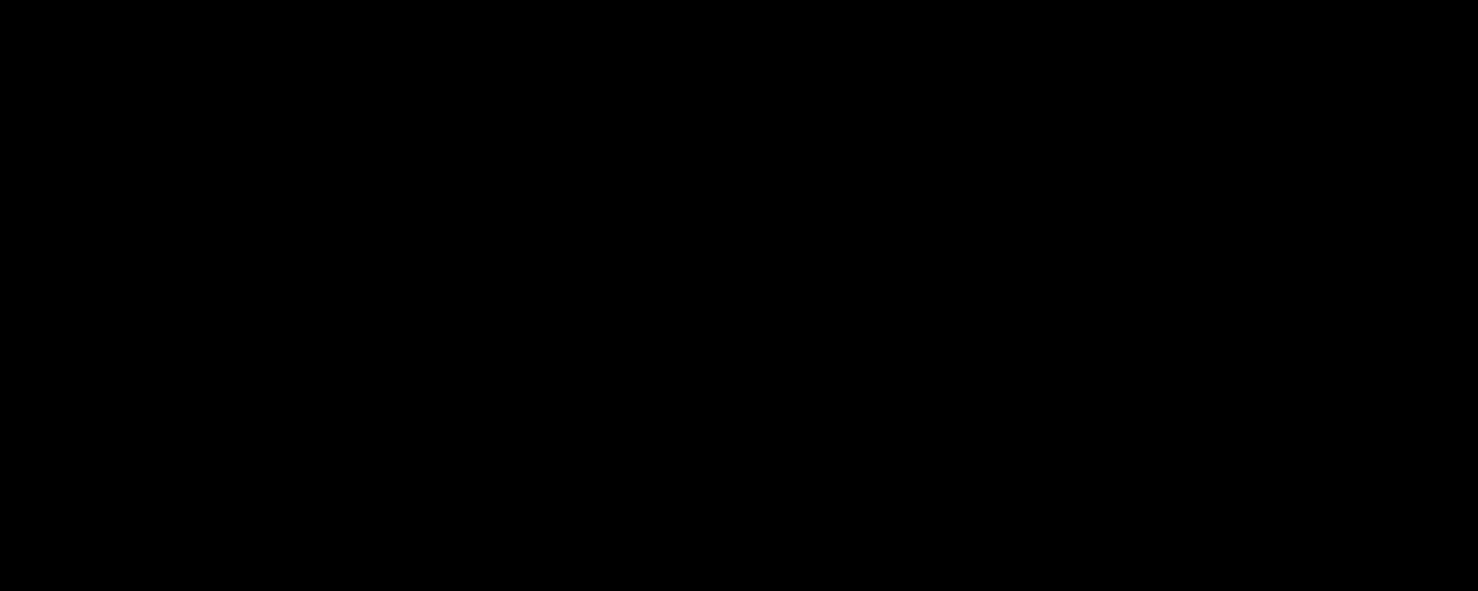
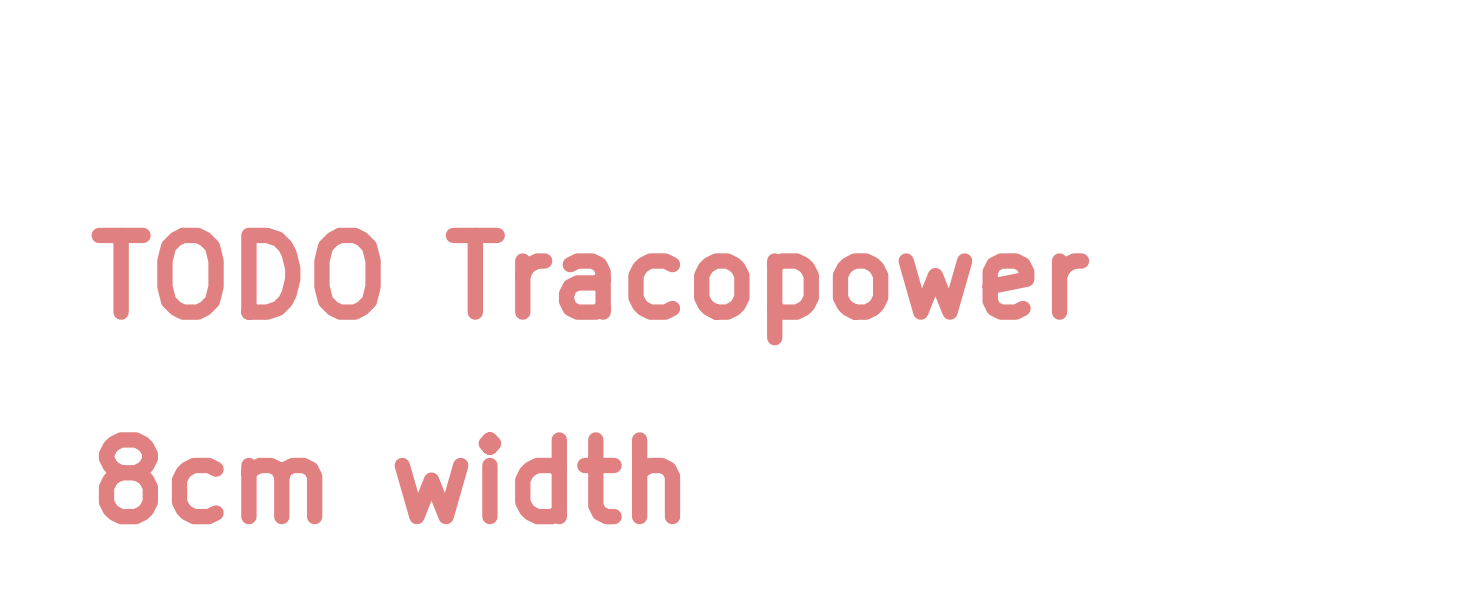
text: none -> TODO Tracopower (590, 286)
text: none -> 8cm width (389, 478)

